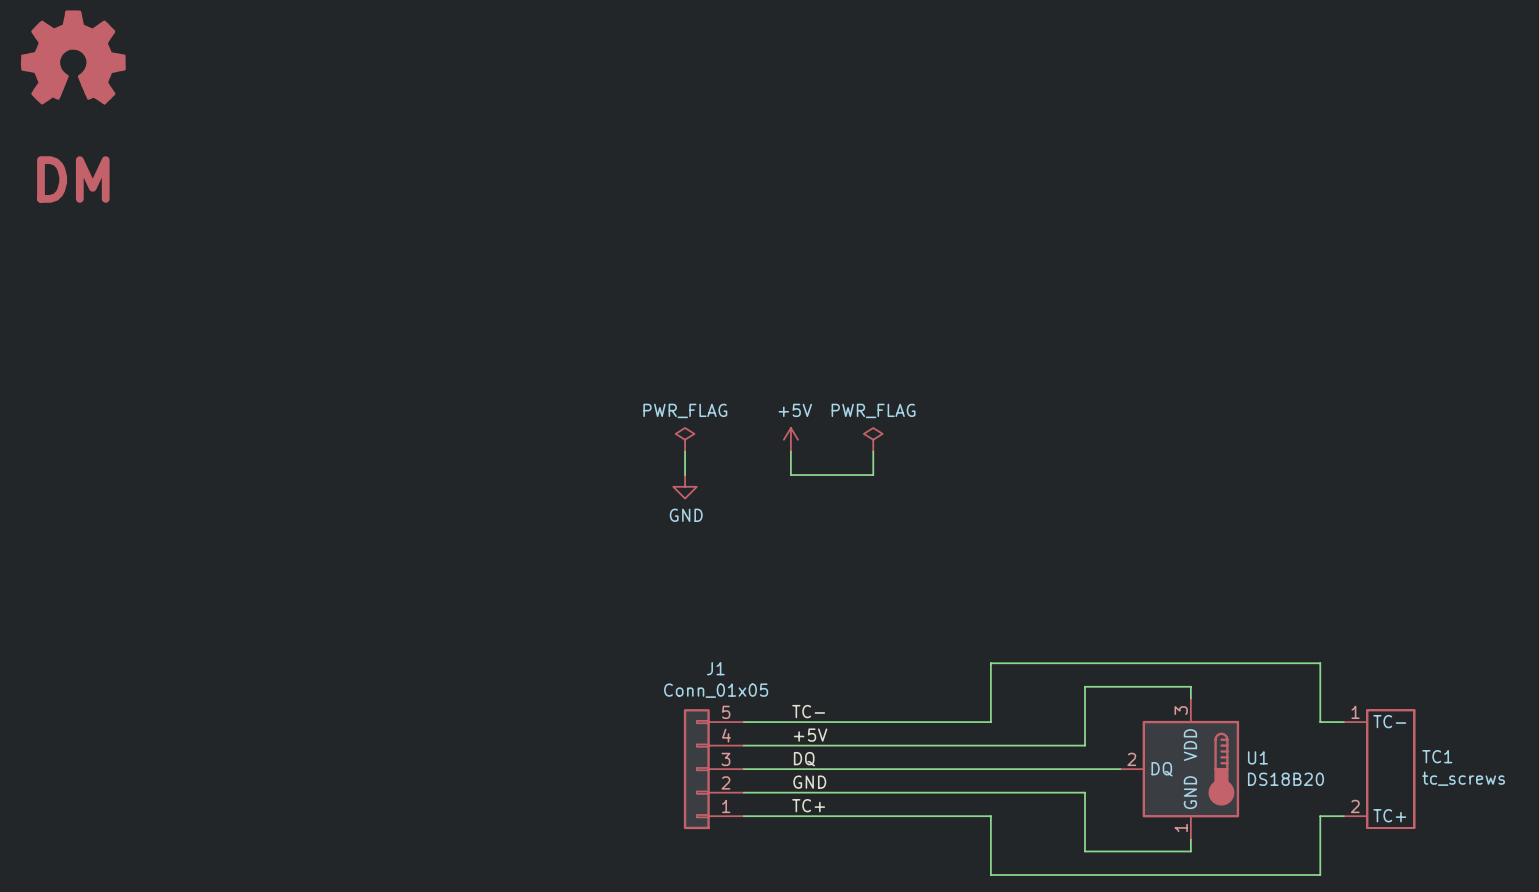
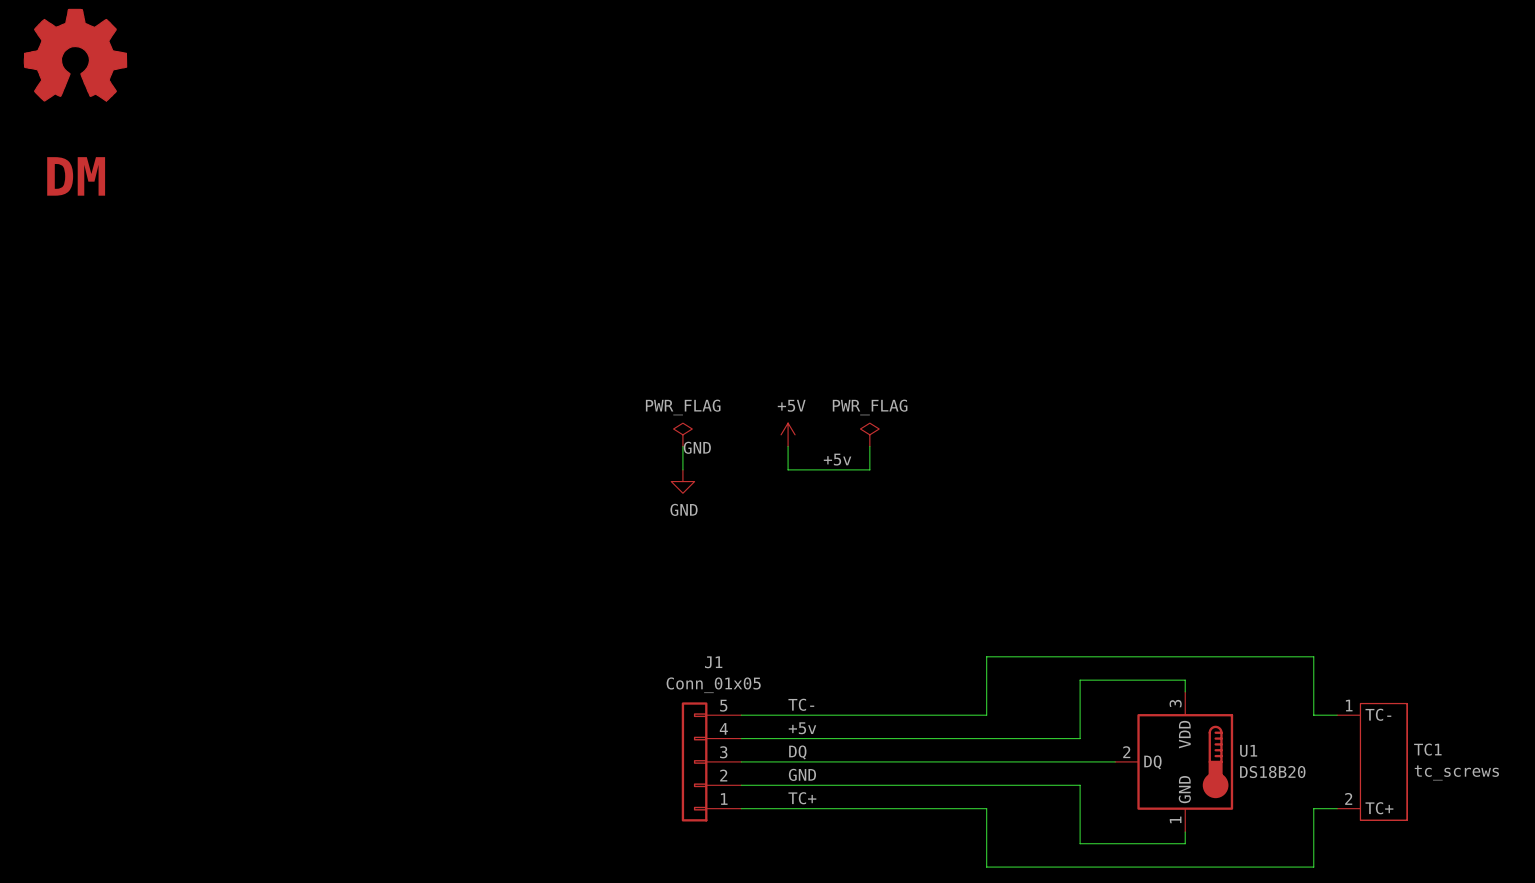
label: none -> GND (697, 447)
label: none -> +5v (837, 459)
label: +5V (810, 735) -> +5v (802, 728)

